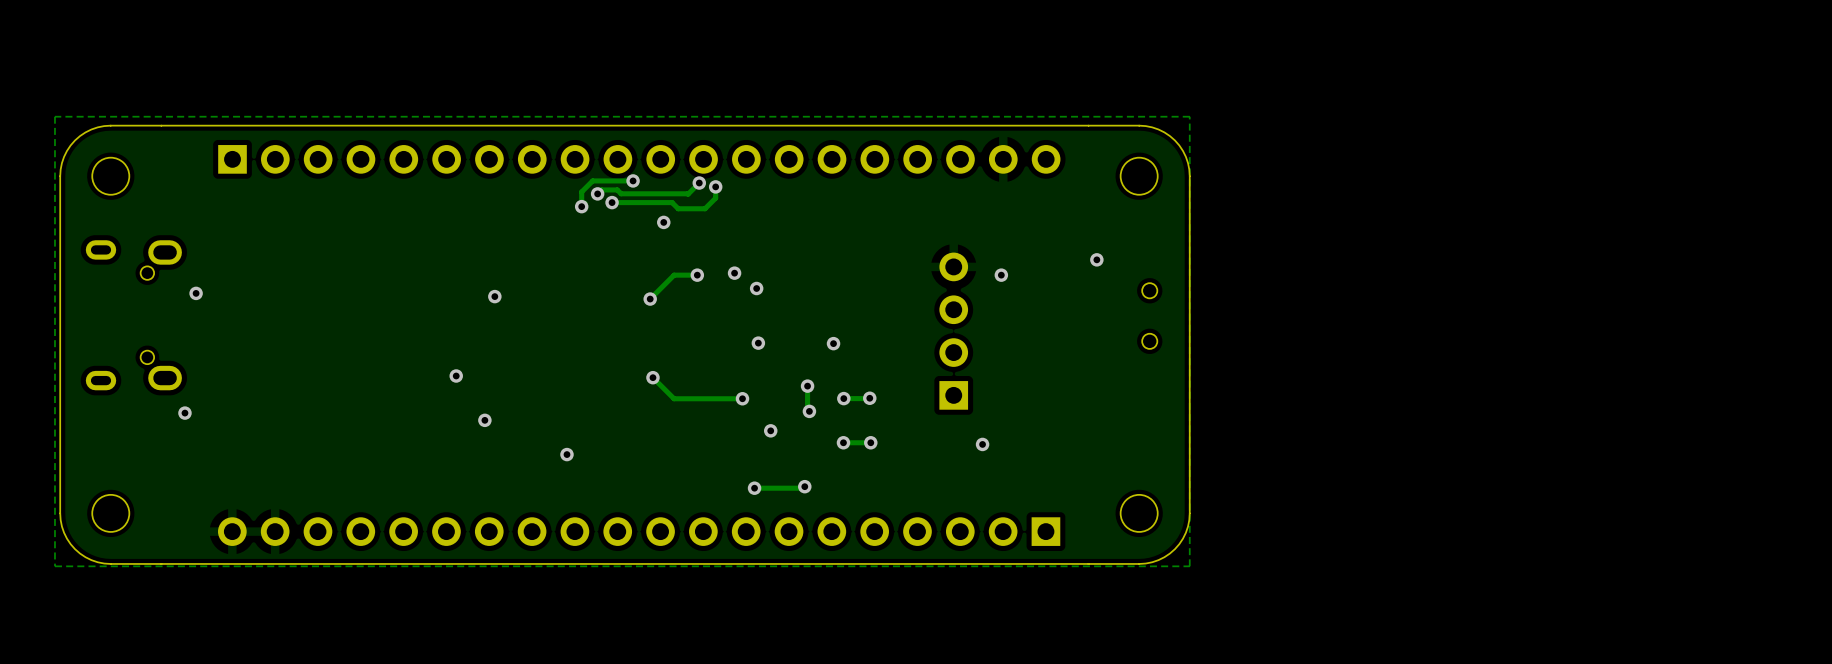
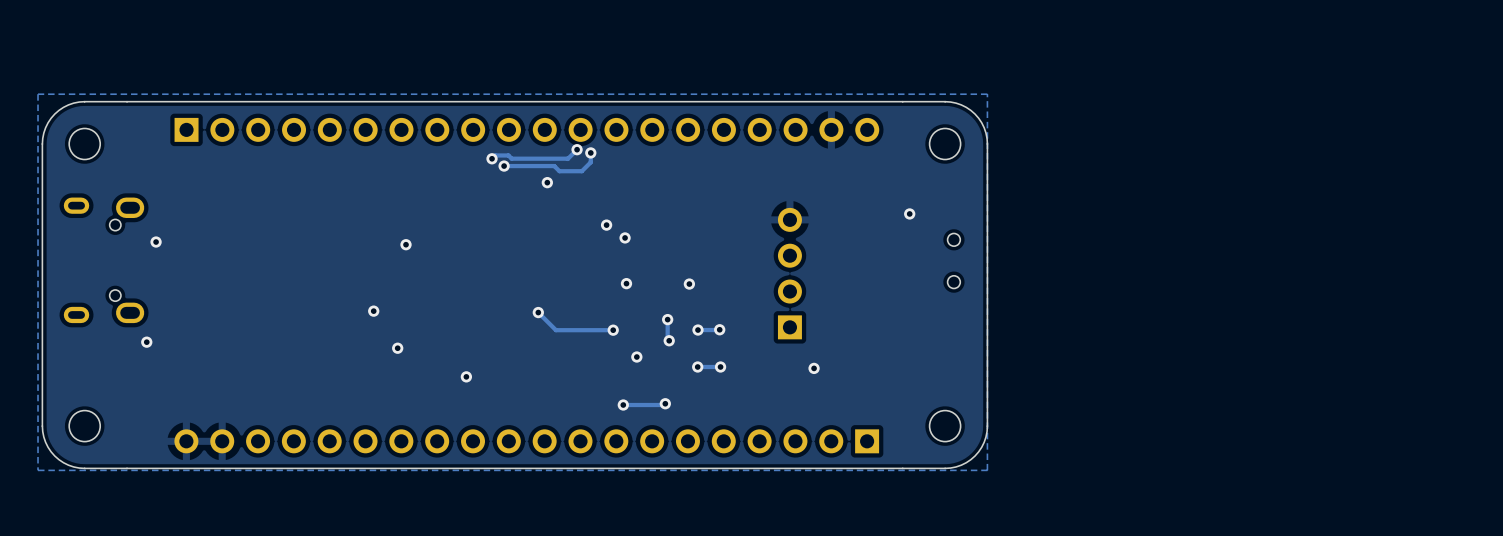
track: (633, 180) (592, 180) (581, 191) (581, 206) (584, 203) -> none
via: (633, 180) -> none
via: (581, 206) -> none
track: (697, 275) (674, 275) (650, 299) -> none
via: (697, 275) -> none
via: (1001, 275) -> none
via: (650, 299) -> none

